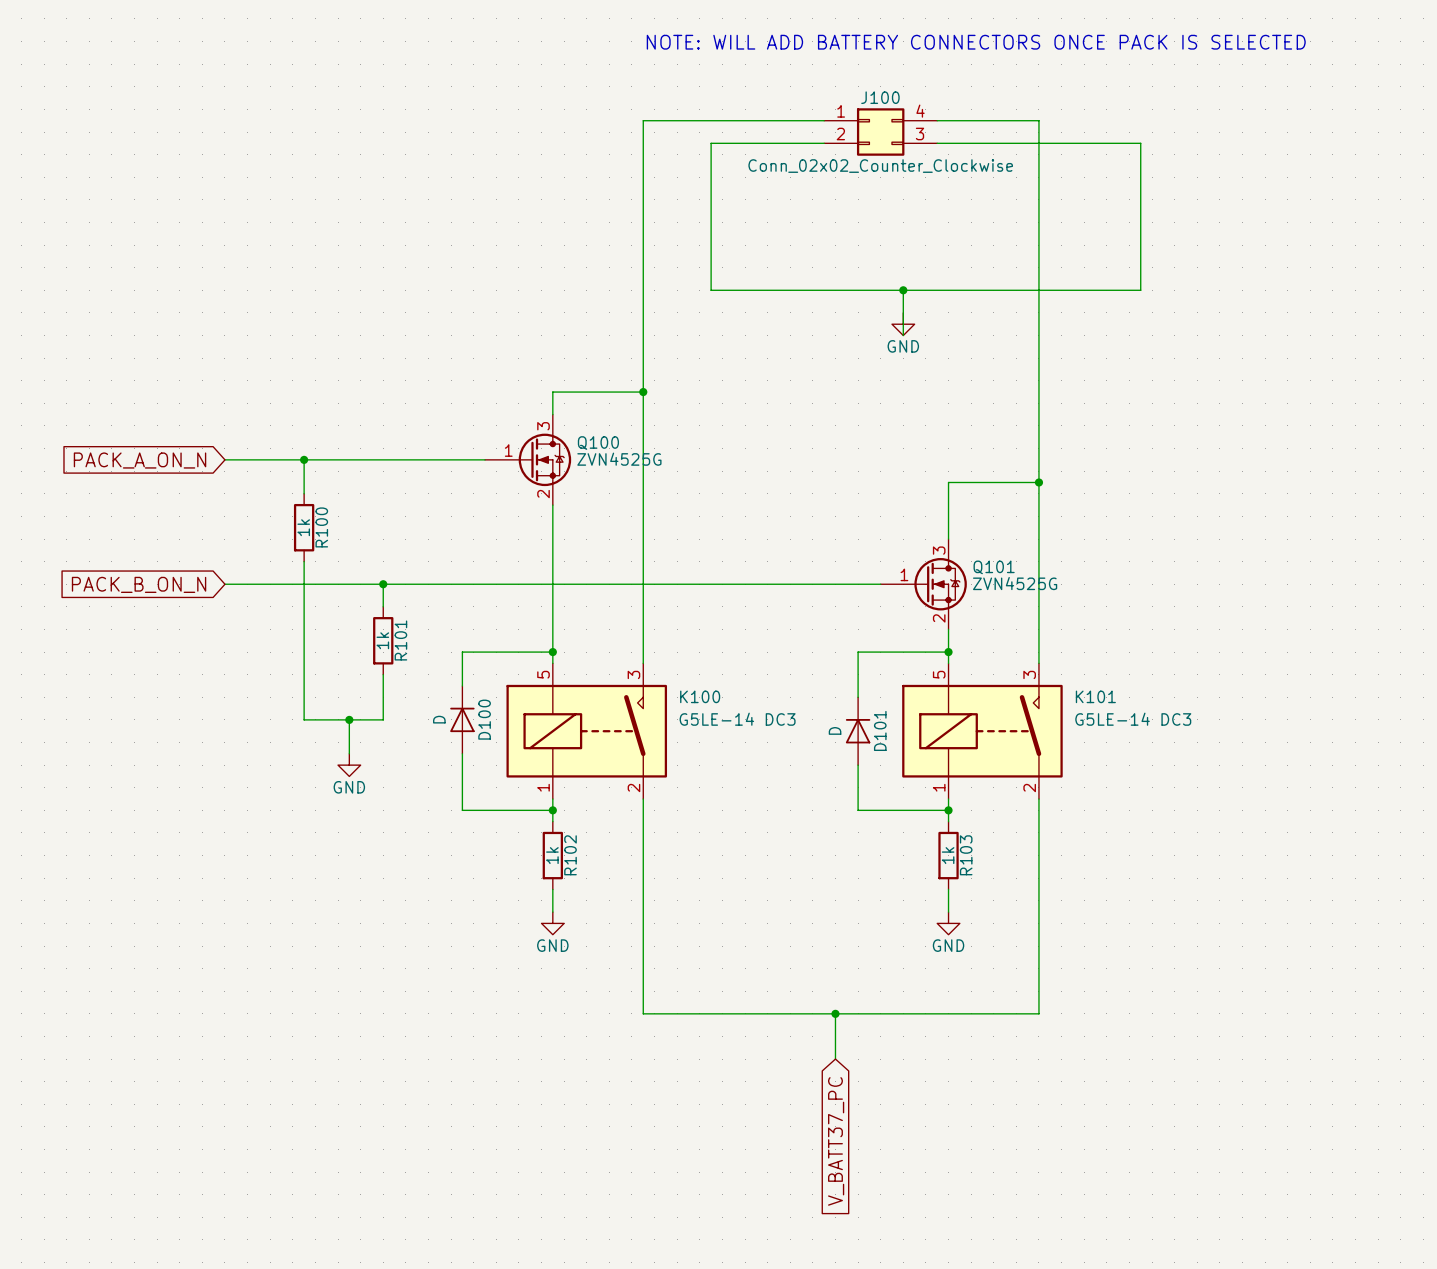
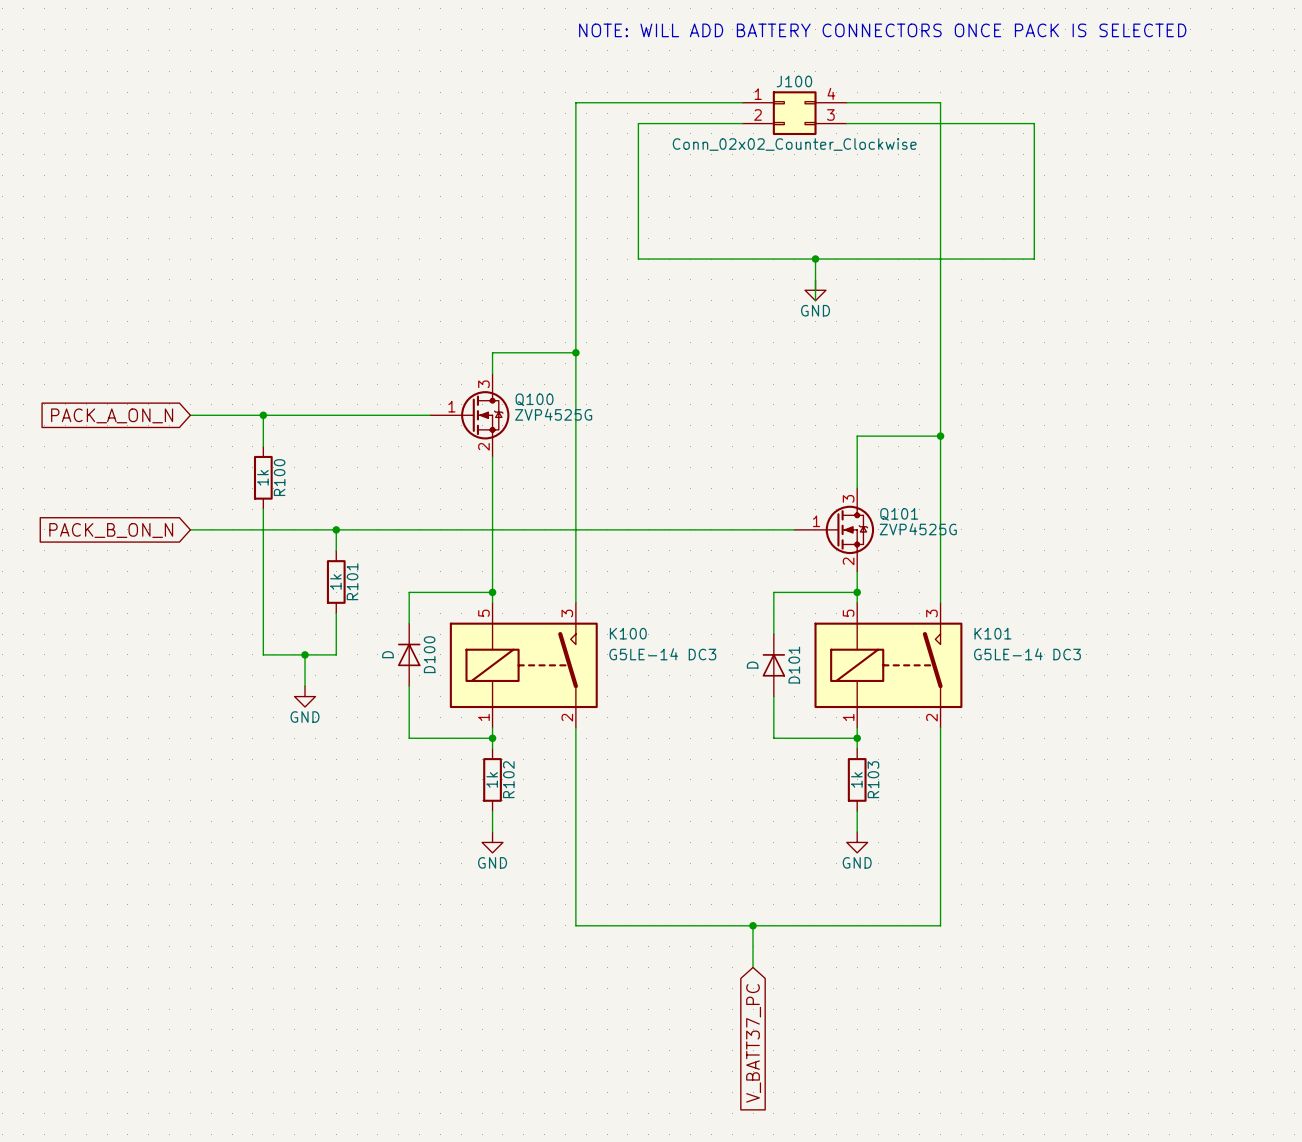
Q100 value: ZVN4525G (619, 459) -> ZVP4525G (553, 414)
Q101 value: ZVN4525G (1015, 583) -> ZVP4525G (918, 529)

